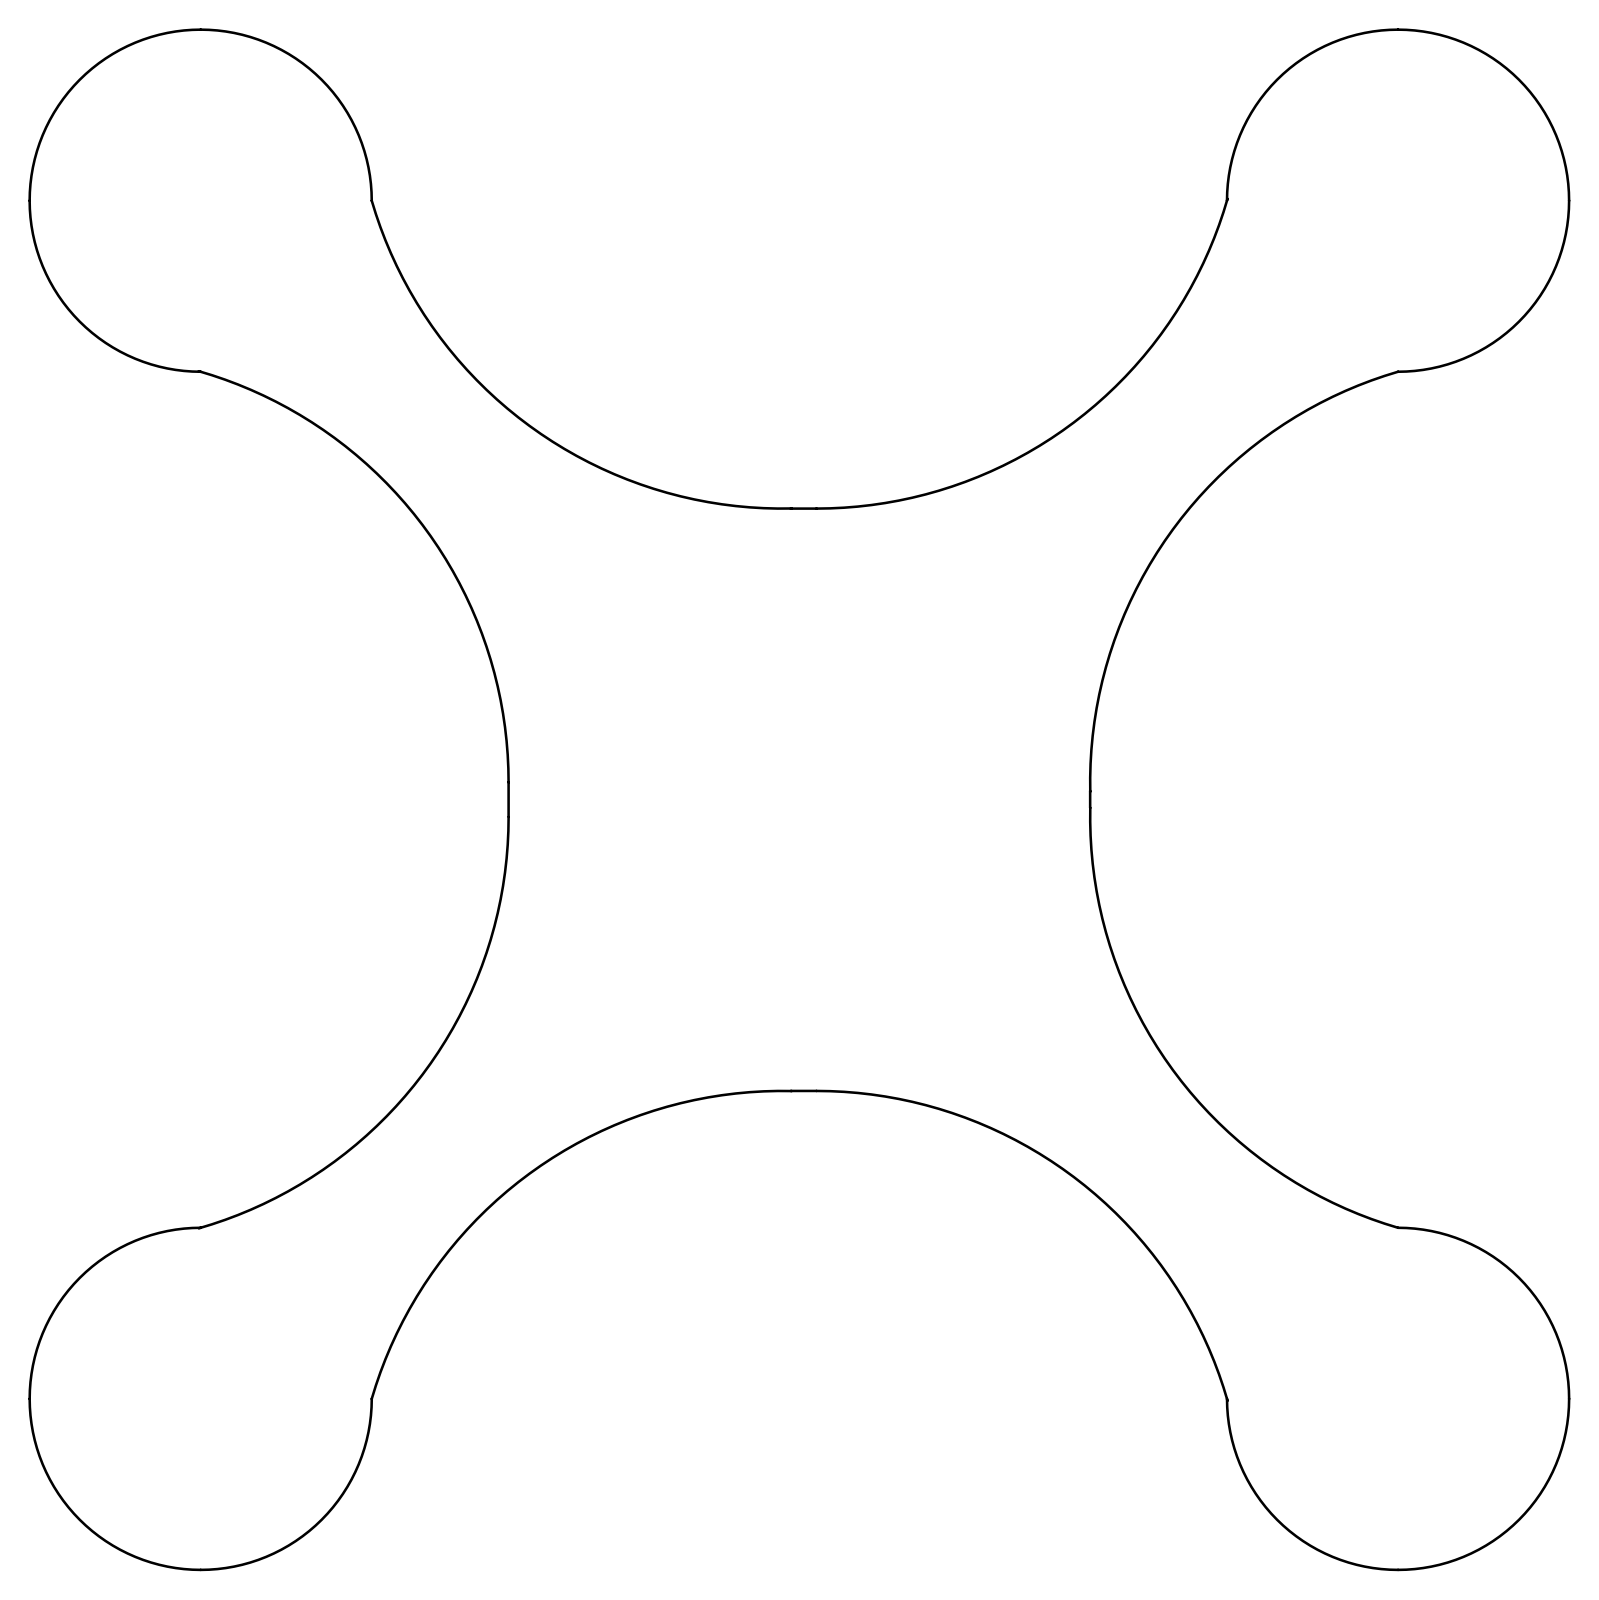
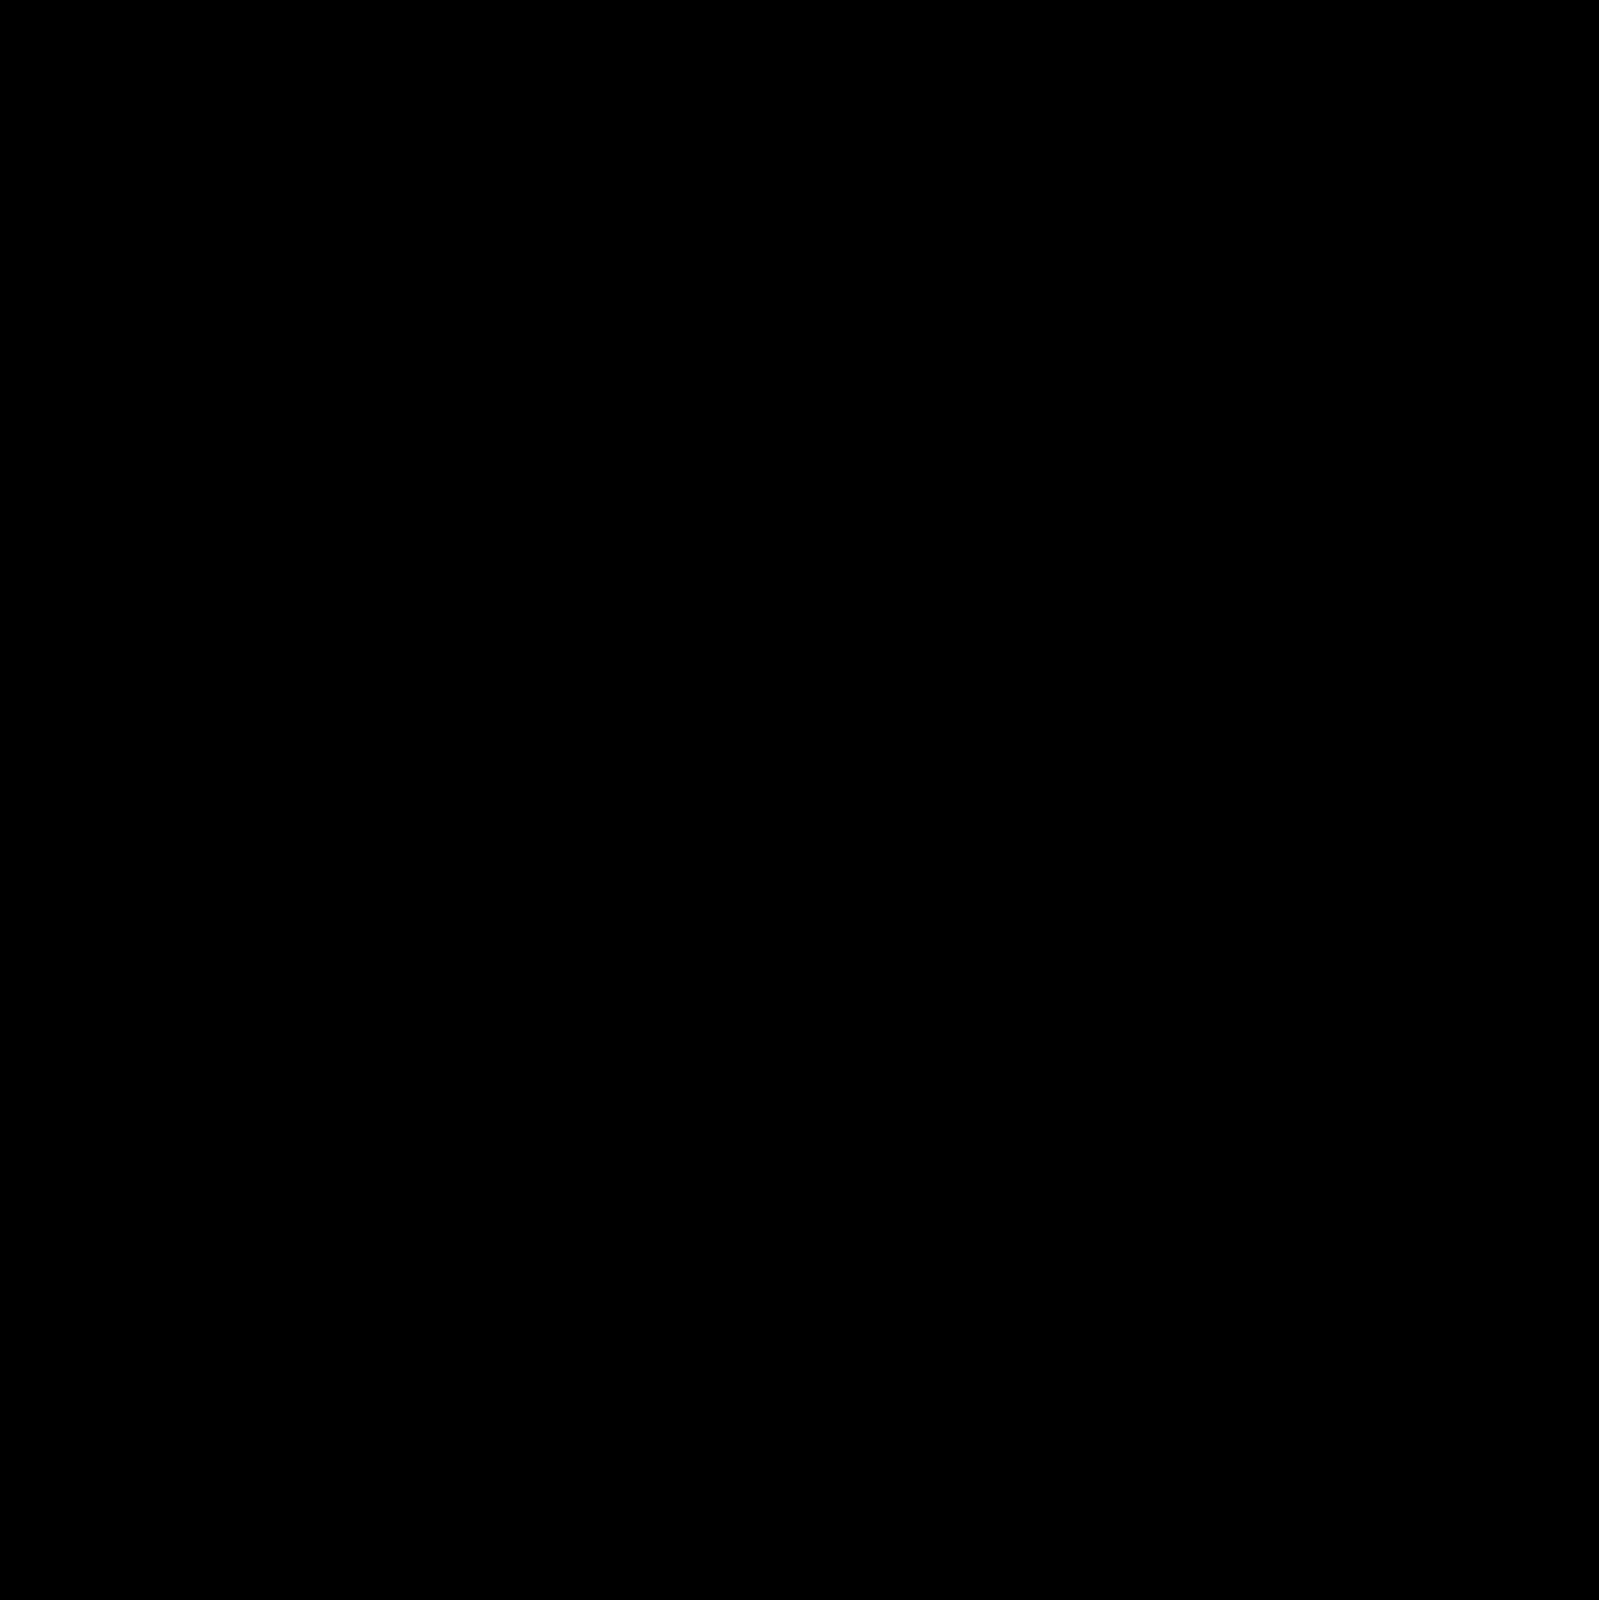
board edge: (1227, 198) (1203, 263) (1168, 323) (1143, 356) (1115, 386) (1062, 430) (1003, 465) (939, 490) (871, 505) (830, 508) (790, 508) -> none
board edge: (1569, 200) (1565, 167) (1556, 135) (1540, 105) (1519, 79) (1493, 58) (1463, 42) (1431, 32) (1398, 29) (1364, 32) (1332, 42) (1303, 58) (1277, 79) (1255, 105) (1240, 135) (1230, 167) (1227, 200) -> none
board edge: (1569, 200) (1565, 234) (1552, 273) (1535, 302) (1506, 332) (1485, 347) (1463, 358) (1431, 368) (1398, 371) (1384, 375) (1345, 390) (1307, 409) (1272, 432) (1239, 457) (1208, 486) (1181, 518) (1142, 576) (1124, 614) (1109, 653) (1094, 721) (1090, 791) -> none
board edge: (198, 371) (263, 395) (323, 429) (376, 473) (405, 503) (430, 536) (465, 595) (481, 633) (494, 673) (506, 740) (508, 816) -> none
board edge: (200, 371) (167, 368) (135, 358) (105, 342) (79, 321) (58, 295) (42, 266) (32, 234) (29, 200) (32, 167) (42, 135) (58, 105) (79, 79) (105, 58) (135, 42) (167, 32) (200, 29) (234, 32) (273, 46) (309, 68) (332, 92) (347, 112) (358, 135) (368, 167) (371, 200) (375, 214) (390, 253) (409, 290) (432, 326) (457, 359) (486, 389) (518, 417) (576, 455) (614, 474) (653, 488) (721, 504) (791, 508) -> none
board edge: (1090, 790) (1090, 807) -> none
board edge: (1090, 807) (1094, 877) (1109, 945) (1124, 985) (1142, 1022) (1181, 1081) (1208, 1112) (1239, 1141) (1272, 1167) (1307, 1189) (1345, 1208) (1384, 1223) (1398, 1227) (1431, 1231) (1463, 1240) (1486, 1252) (1506, 1266) (1530, 1290) (1552, 1325) (1563, 1357) (1569, 1398) (1565, 1432) (1556, 1464) (1540, 1493) (1519, 1519) (1493, 1541) (1463, 1556) (1431, 1566) (1398, 1569) (1364, 1566) (1332, 1556) (1303, 1541) (1277, 1519) (1255, 1493) (1240, 1464) (1230, 1432) (1227, 1398) -> none
board edge: (508, 817) (503, 886) (486, 952) (459, 1016) (422, 1074) (376, 1126) (323, 1169) (263, 1204) (198, 1228) -> none
board edge: (790, 1090) (830, 1091) (871, 1094) (939, 1108) (1003, 1133) (1062, 1168) (1115, 1213) (1160, 1265) (1197, 1323) (1214, 1361) (1227, 1400) -> none
board edge: (791, 1091) (721, 1095) (653, 1110) (589, 1137) (552, 1157) (518, 1182) (486, 1209) (457, 1240) (432, 1273) (409, 1308) (390, 1346) (375, 1385) (371, 1398) (368, 1432) (358, 1464) (347, 1486) (332, 1507) (309, 1531) (273, 1553) (234, 1566) (200, 1569) (167, 1566) (135, 1556) (105, 1541) (79, 1519) (58, 1493) (42, 1464) (32, 1432) (29, 1398) (32, 1365) (42, 1333) (58, 1303) (79, 1277) (105, 1256) (135, 1240) (167, 1231) (200, 1227) -> none

